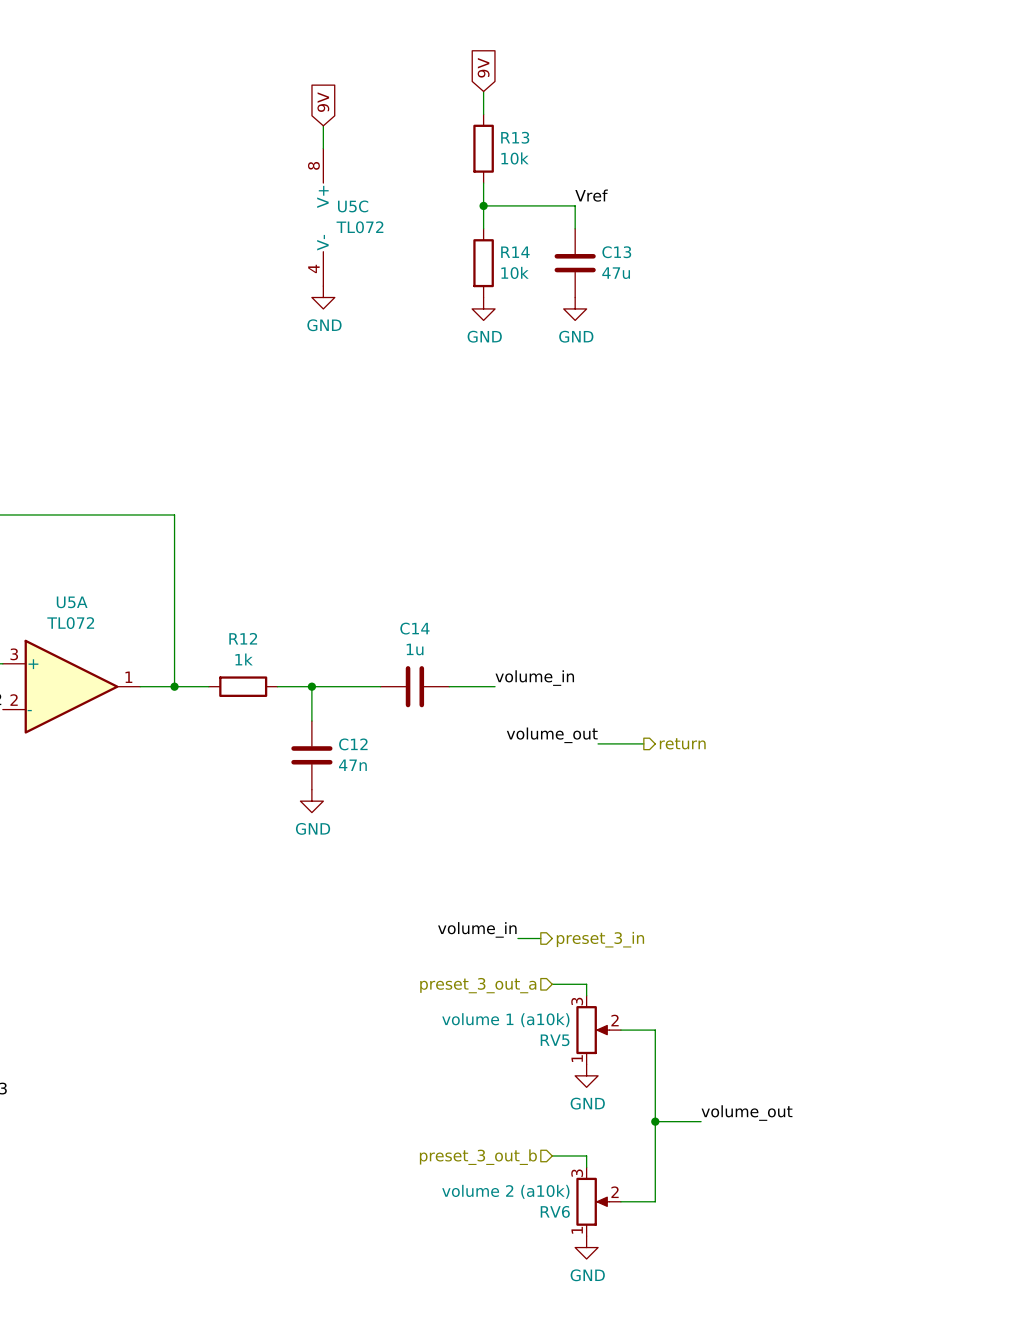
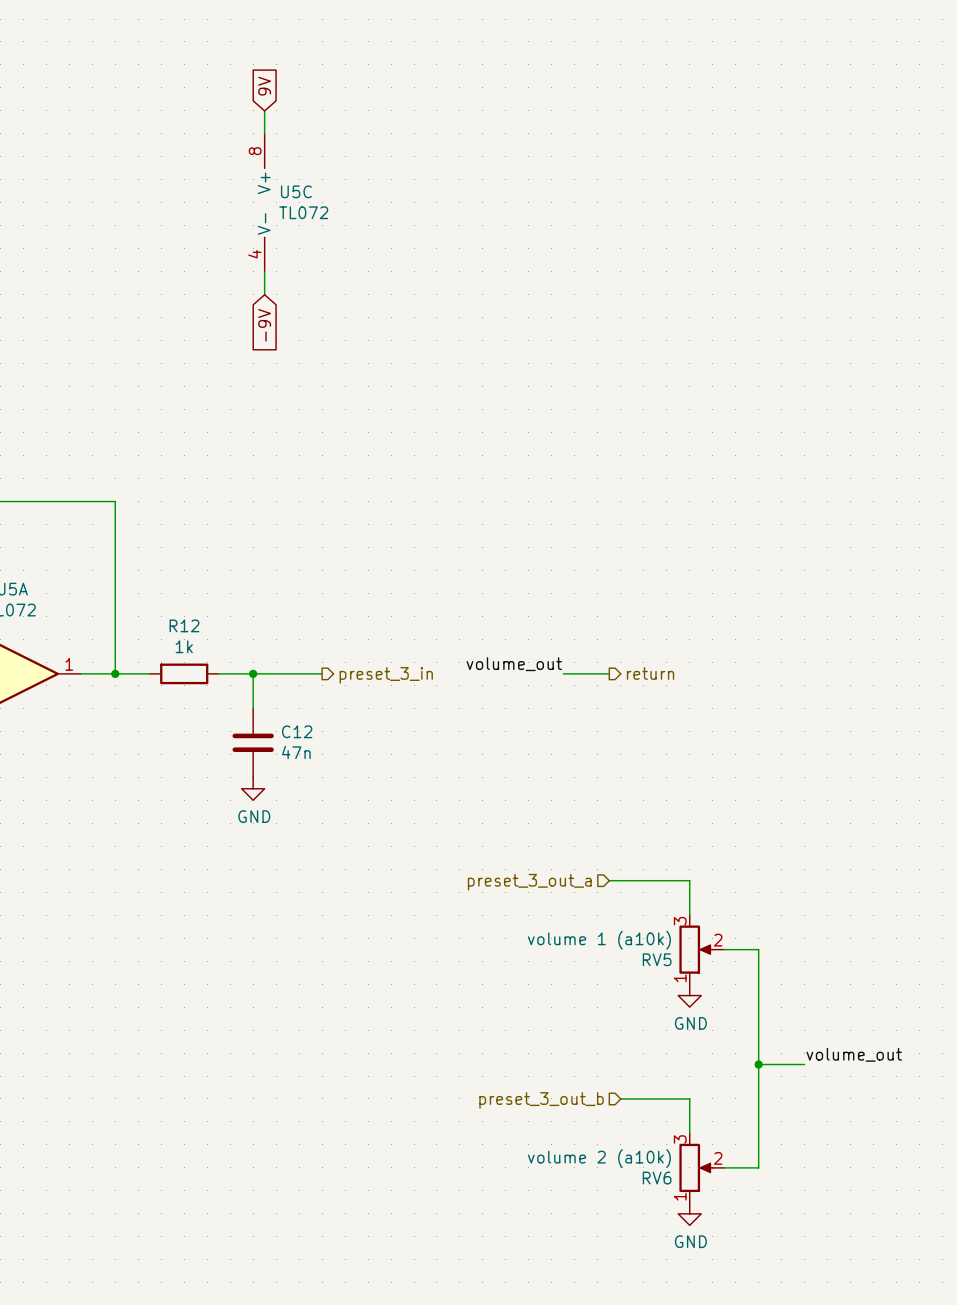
global label: 9V (483, 67) -> none
wire: (483, 91) (483, 114) -> none
R13: 10k (483, 148) -> none
wire: (483, 183) (483, 228) -> none
label: Vref (591, 195) -> none
wire: (483, 205) (575, 205) (575, 228) -> none
junction: (483, 205) -> none
R14: 10k (483, 263) -> none
C13: 47u (575, 263) -> none
power symbol: GND (323, 297) -> none
power symbol: GND (483, 308) -> none
power symbol: GND (575, 308) -> none
global label: none -> -9V (264, 325)
label: volume_in (534, 678) -> none
C14: 1u (414, 686) -> none
wire: (449, 686) (495, 686) -> none
hierarchical label: none -> preset_3_in (386, 675)
label position: volume_out (552, 735) -> volume_out (514, 664)
wire: (598, 743) (643, 743) -> (563, 673) (609, 673)
hierarchical label position: return (682, 743) -> return (650, 673)
wire: none -> (609, 880) (689, 880) (689, 915)
label: volume_in (477, 929) -> none
wire: (517, 938) (540, 938) -> none
hierarchical label: preset_3_in (600, 939) -> none
wire: none -> (724, 949) (758, 949) (758, 1167) (724, 1167)
wire: (552, 984) (586, 984) (586, 995) -> none
hierarchical label position: preset_3_out_a (478, 985) -> preset_3_out_a (529, 882)
power symbol: none -> GND (689, 995)
RV5 position: (598, 1030) -> (701, 949)
wire: (620, 1030) (655, 1030) (655, 1201) (620, 1201) -> none
power symbol: GND (586, 1075) -> none
junction: none -> (758, 1064)
wire: none -> (620, 1098) (689, 1098) (689, 1133)
label position: volume_out (746, 1113) -> volume_out (854, 1054)
wire: (655, 1121) (701, 1121) -> (758, 1064) (804, 1064)
junction: (655, 1121) -> none
wire: (552, 1155) (586, 1155) (586, 1167) -> none
hierarchical label position: preset_3_out_b (478, 1157) -> preset_3_out_b (541, 1100)
RV6 position: (598, 1201) -> (701, 1167)
power symbol: none -> GND (689, 1213)
power symbol: GND (586, 1247) -> none

